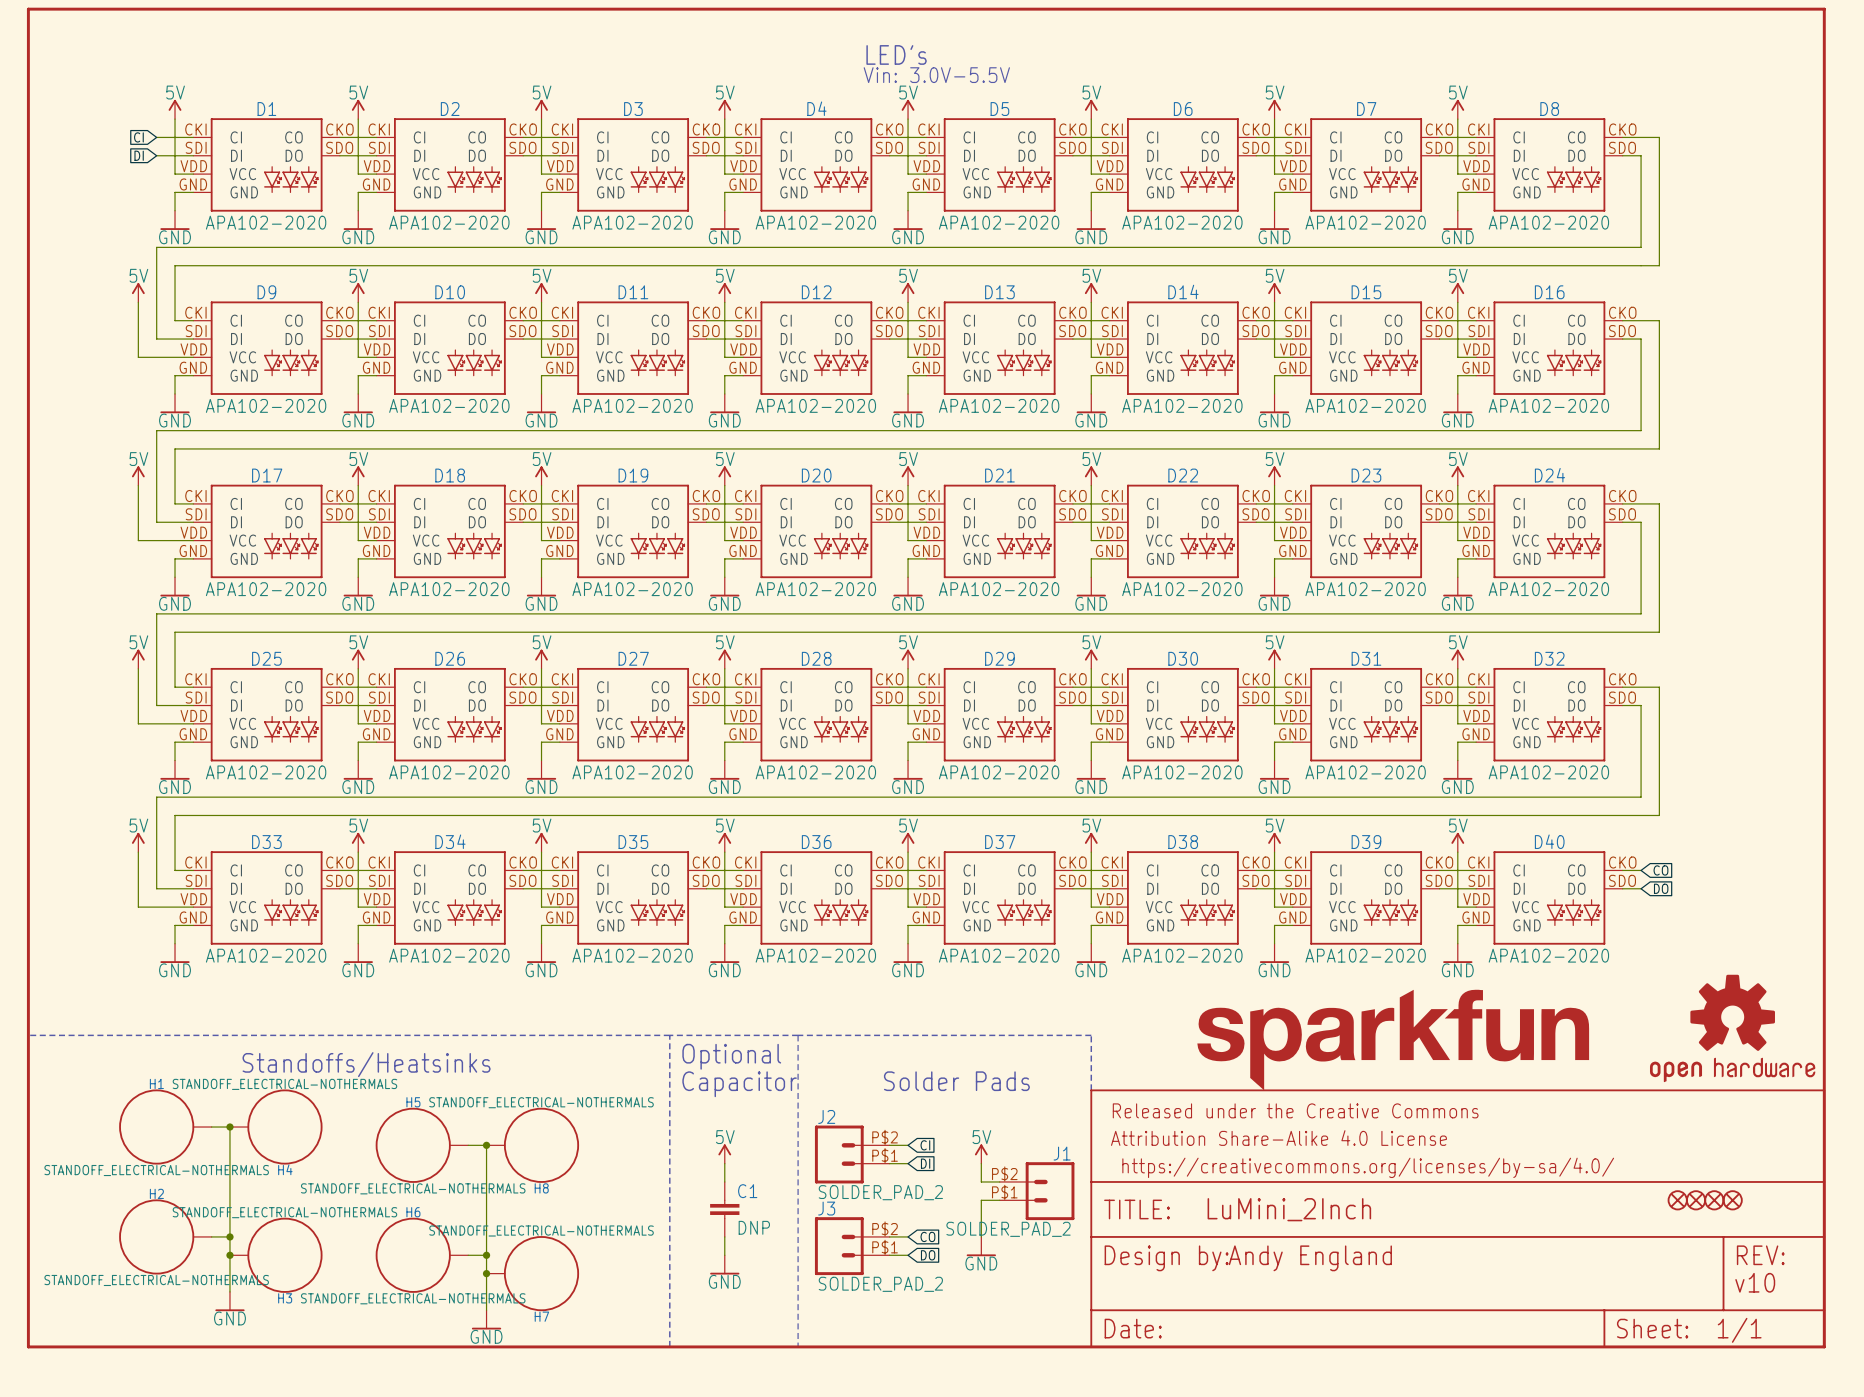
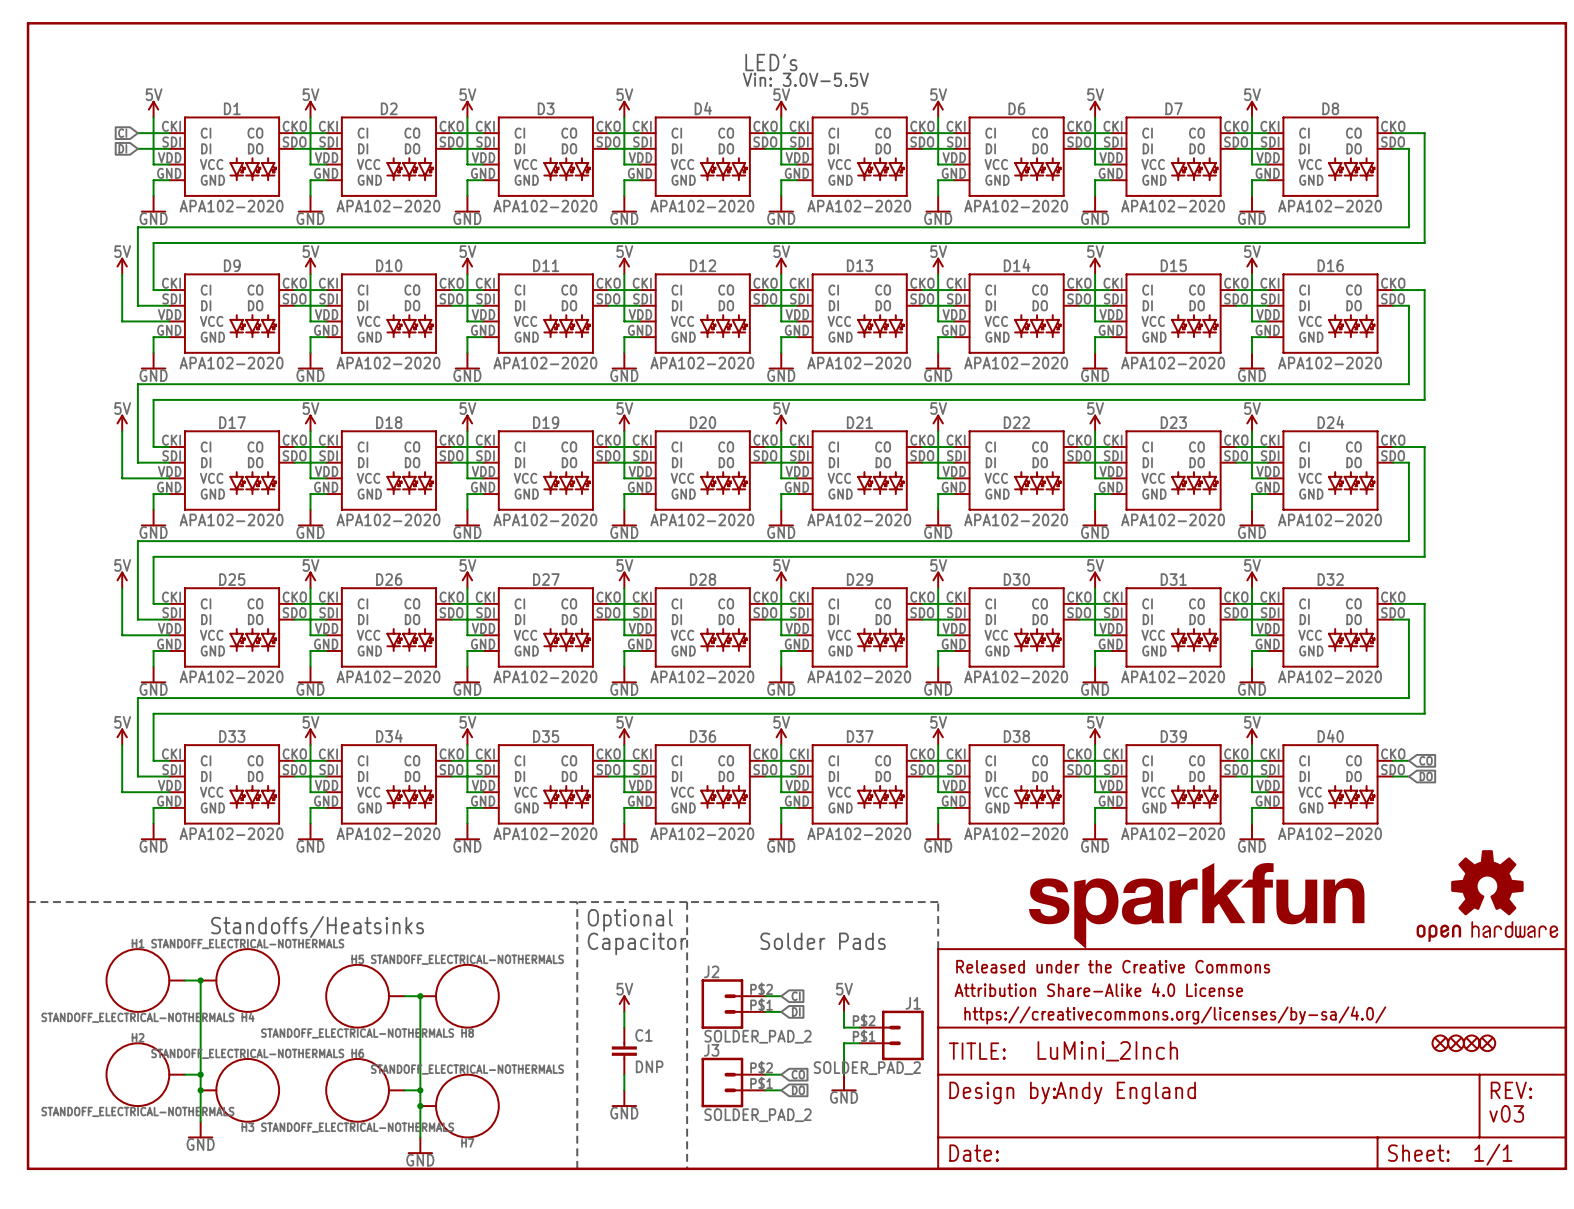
text: v10 (1755, 1282) -> v03 (1506, 1113)

